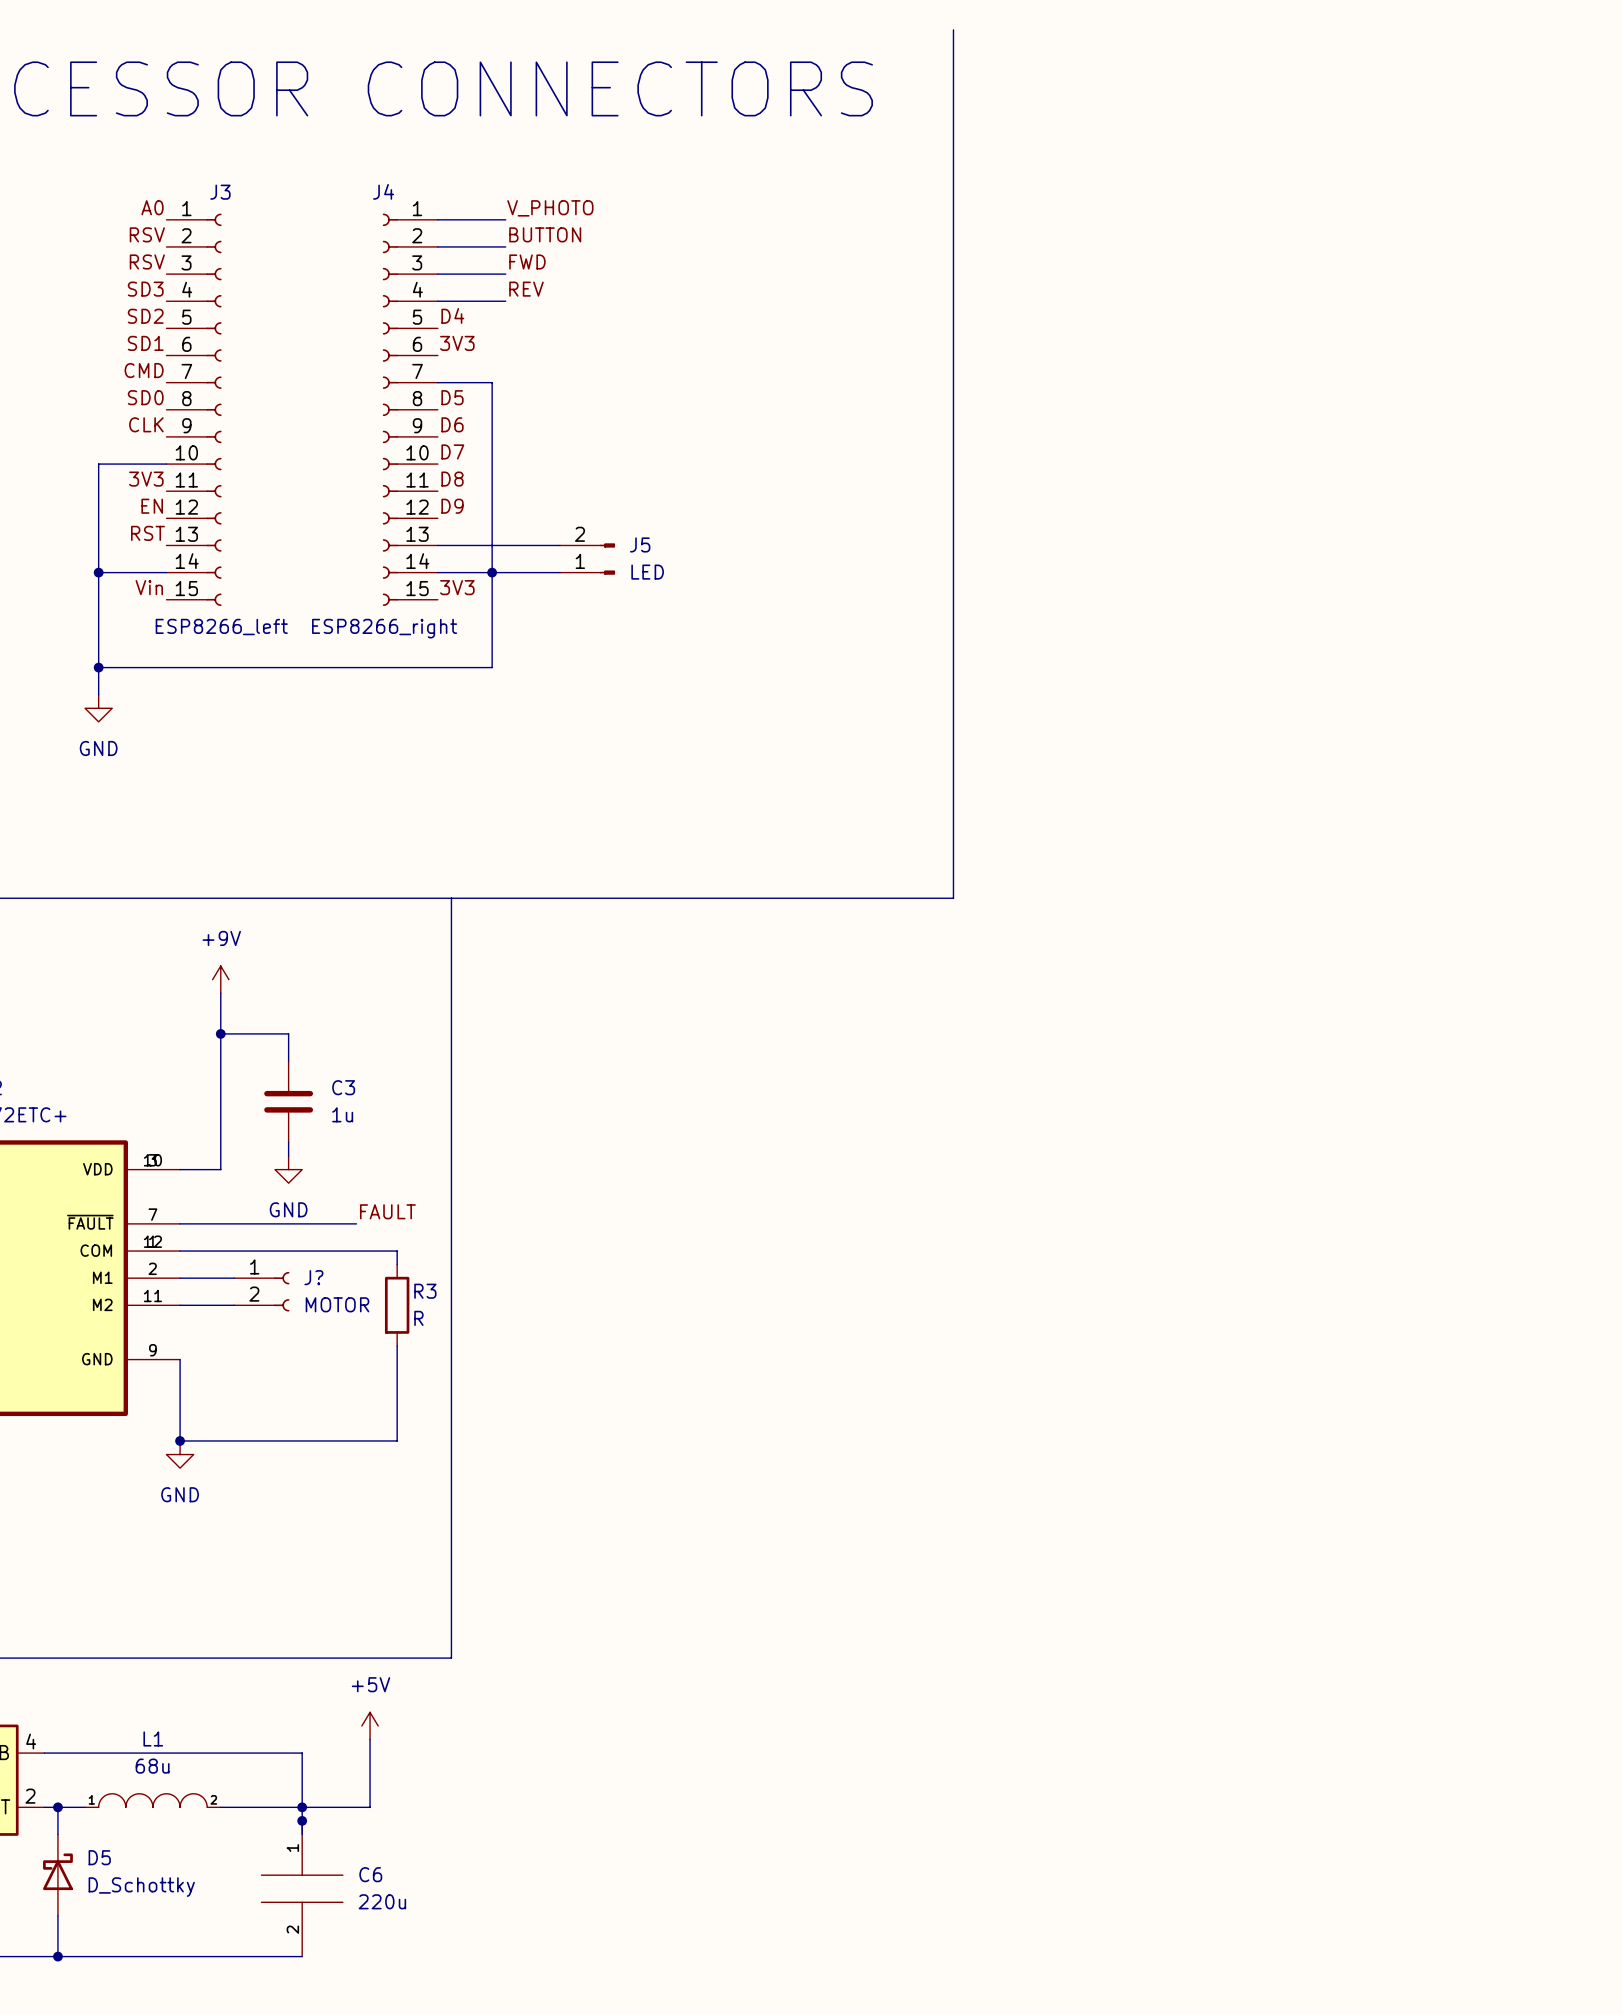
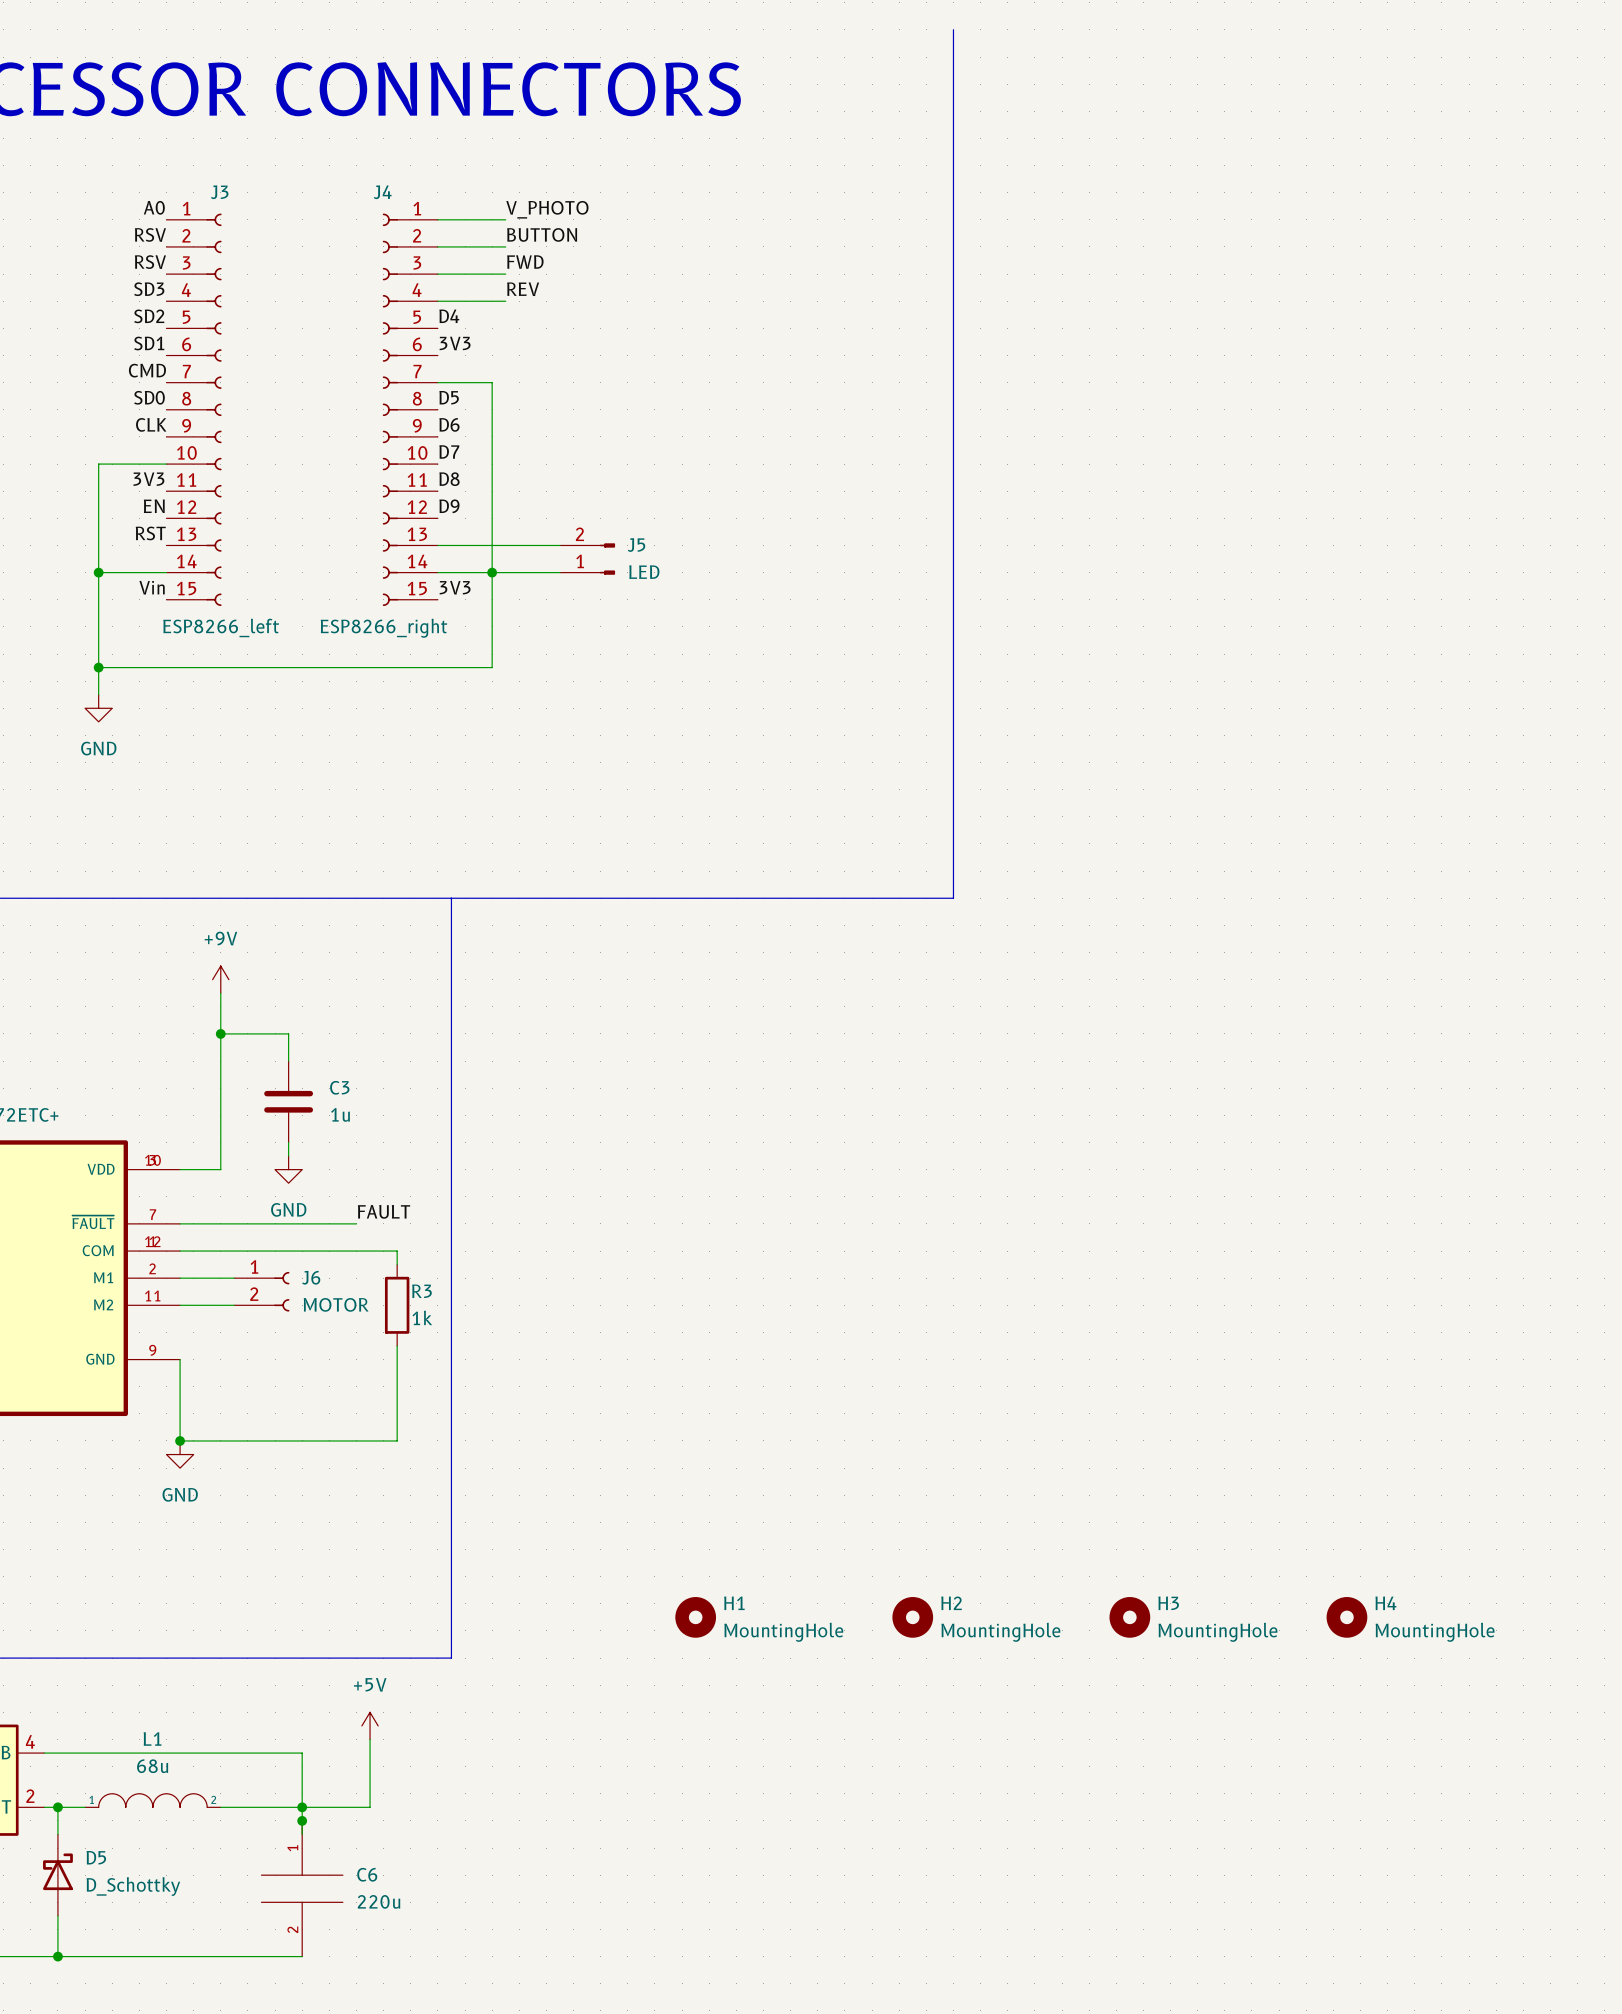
J? name: J? (313, 1277) -> J6 (311, 1277)
R3 value: R (418, 1318) -> 1k (422, 1317)
H1: none -> MountingHole (695, 1617)
H2: none -> MountingHole (912, 1617)
H3: none -> MountingHole (1129, 1617)
H4: none -> MountingHole (1346, 1617)

